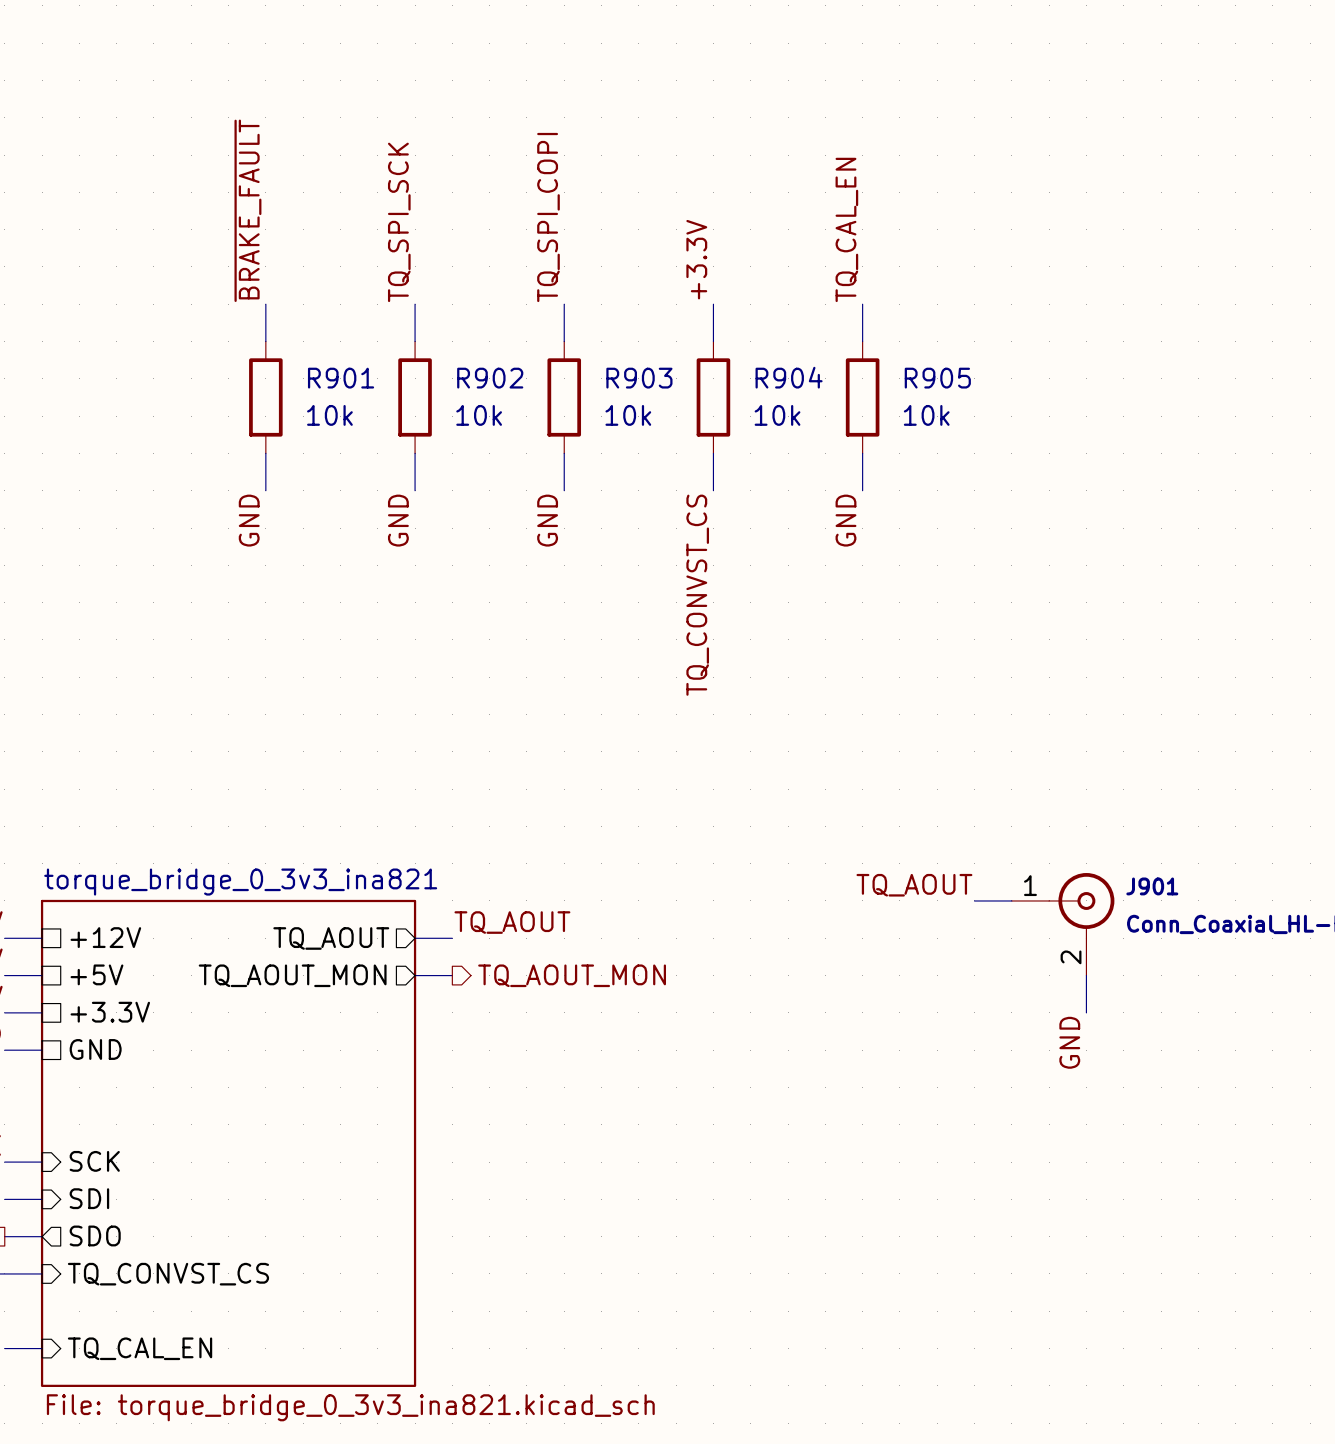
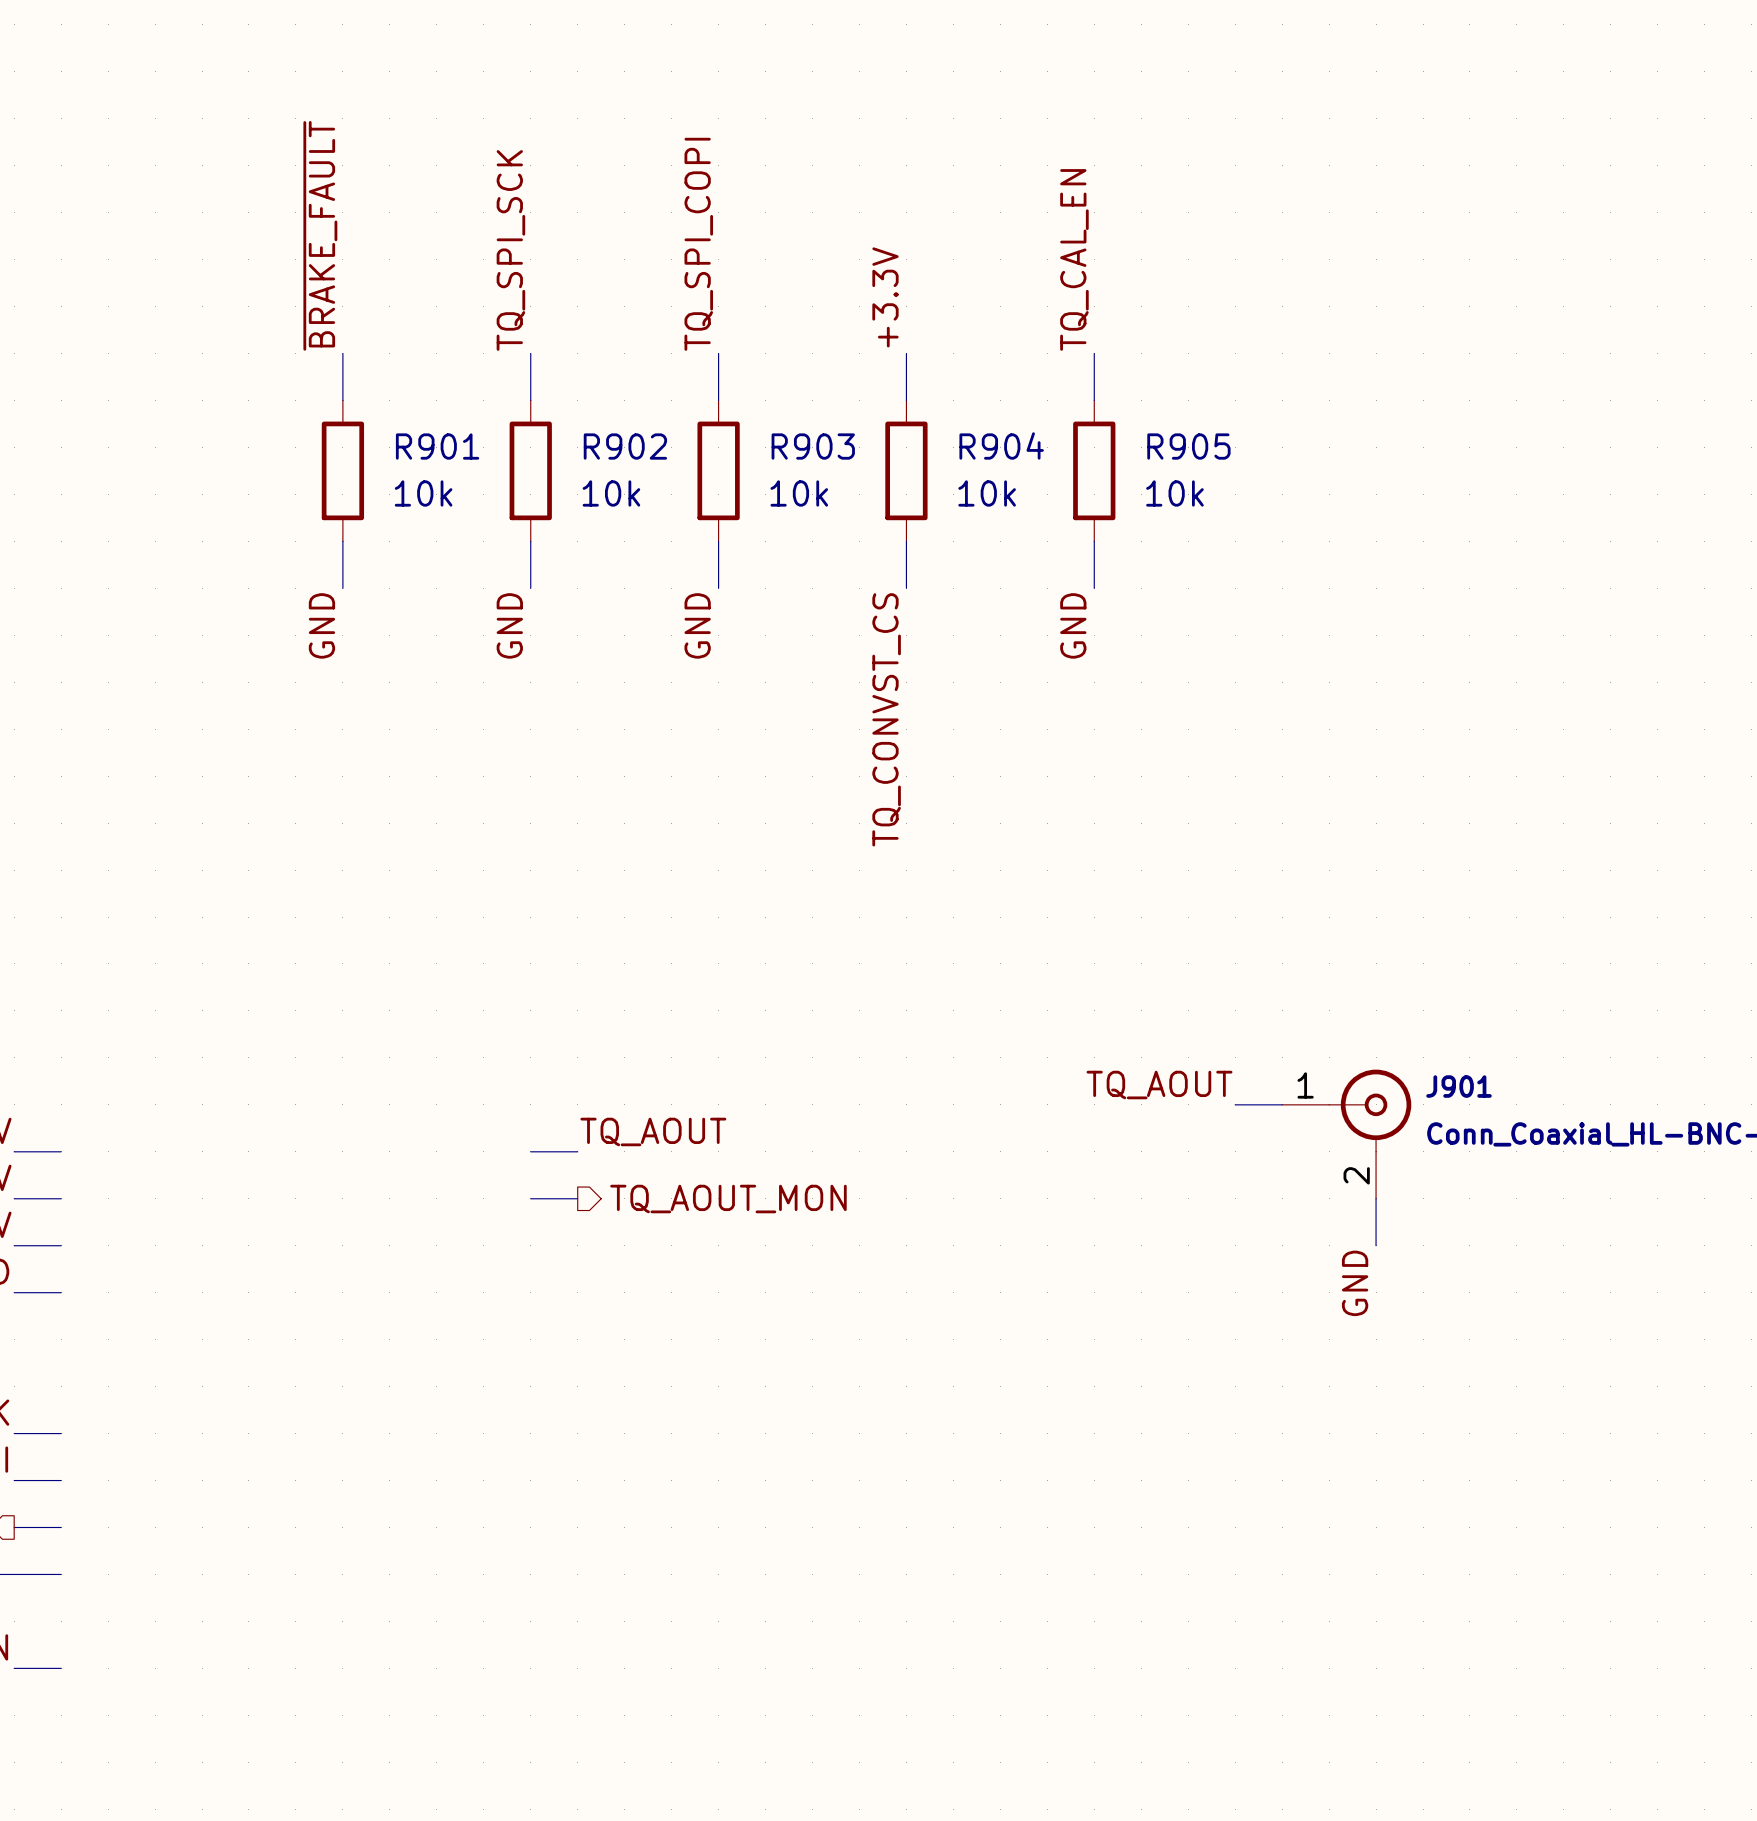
sheet pin: +12V (105, 937) -> none
sheet pin: TQ_AOUT (331, 938) -> none
sheet pin: +5V (96, 974) -> none
sheet pin: TQ_AOUT_MON (292, 975) -> none
sheet pin: +3.3V (110, 1012) -> none
sheet pin: GND (95, 1049) -> none
sheet torque_bridge_0_3v3_ina821: File: torque_bridge_0_3v3_ina821.kicad_sch (228, 1143) -> none
sheet pin: SCK (94, 1161) -> none
sheet pin: SDI (89, 1198) -> none
sheet pin: SDO (95, 1235) -> none
sheet pin: TQ_CONVST_CS (168, 1274) -> none
sheet pin: TQ_CAL_EN (140, 1348) -> none

